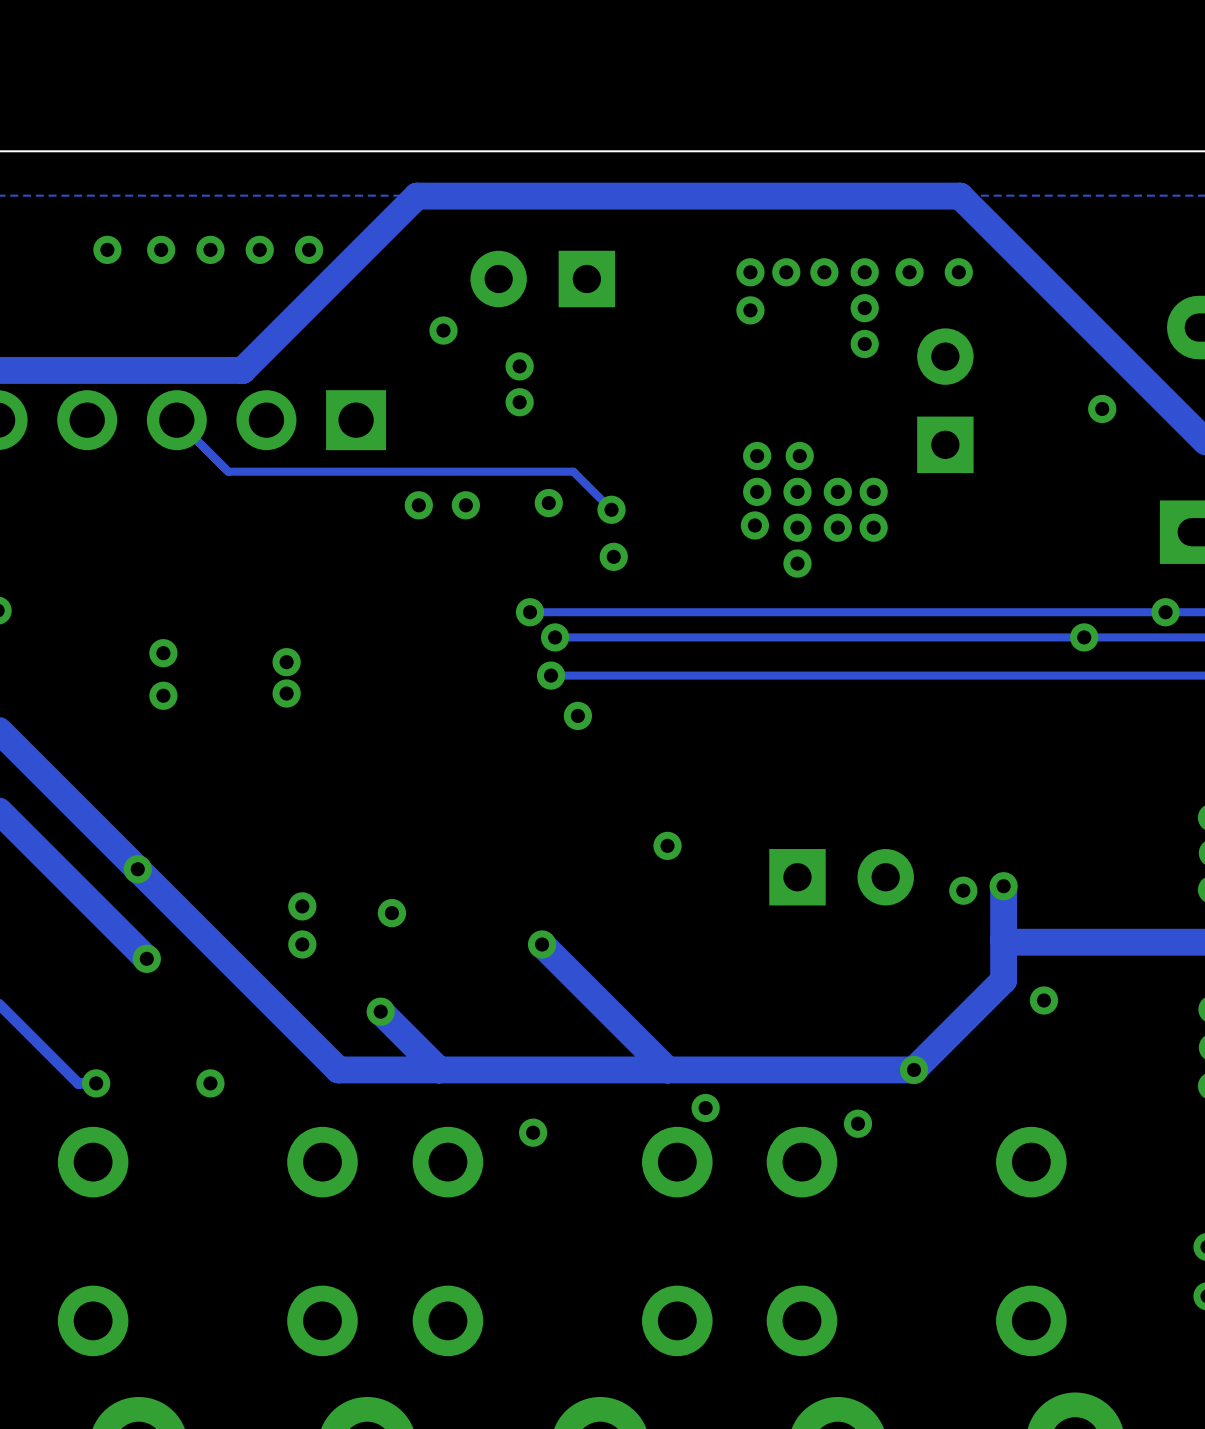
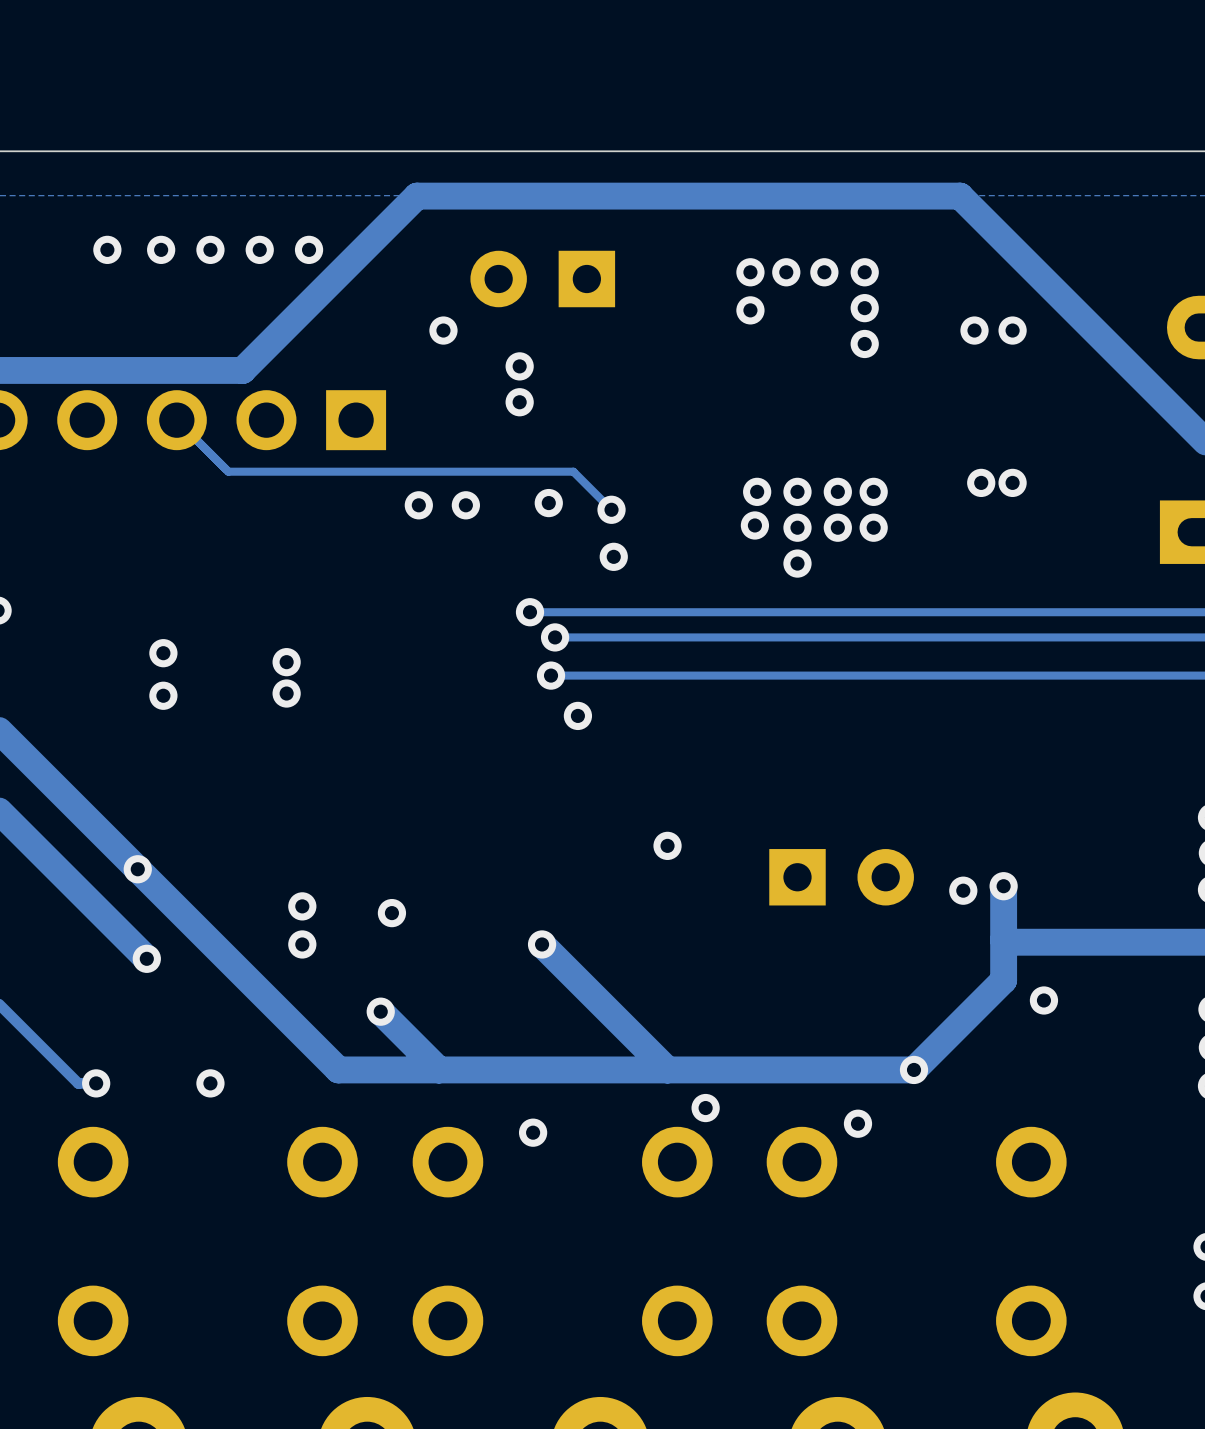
via: (909, 272) -> none
via: (958, 272) -> none
via: none -> (974, 330)
via: none -> (1012, 330)
part: (945, 400) -> none
via: (1102, 408) -> none
via: (757, 456) -> none
via: (799, 456) -> none
via: none -> (981, 482)
via: none -> (1012, 482)
via: (1165, 612) -> none
via: (1084, 637) -> none

